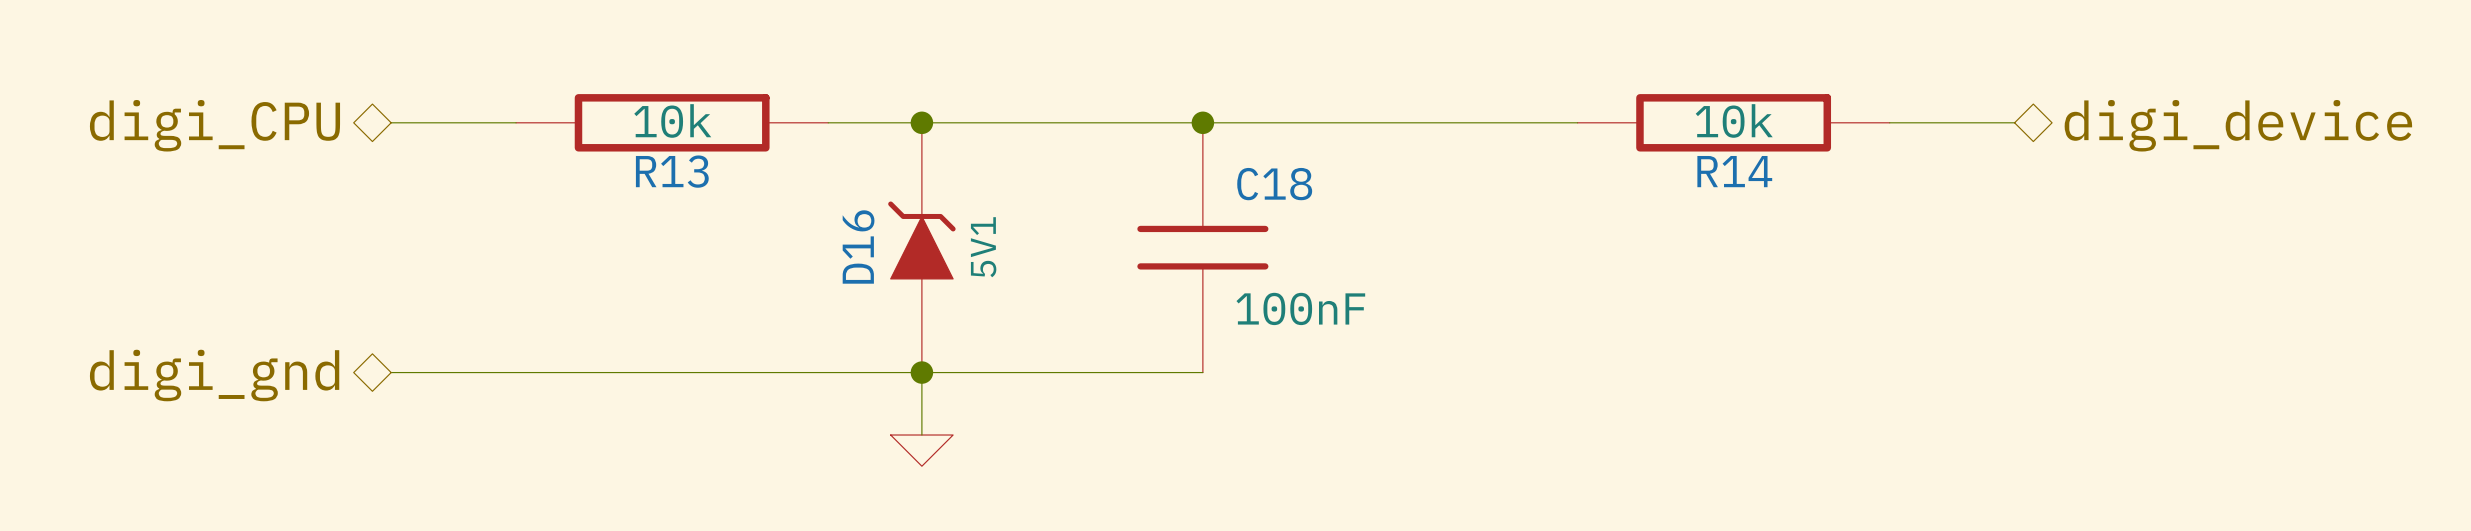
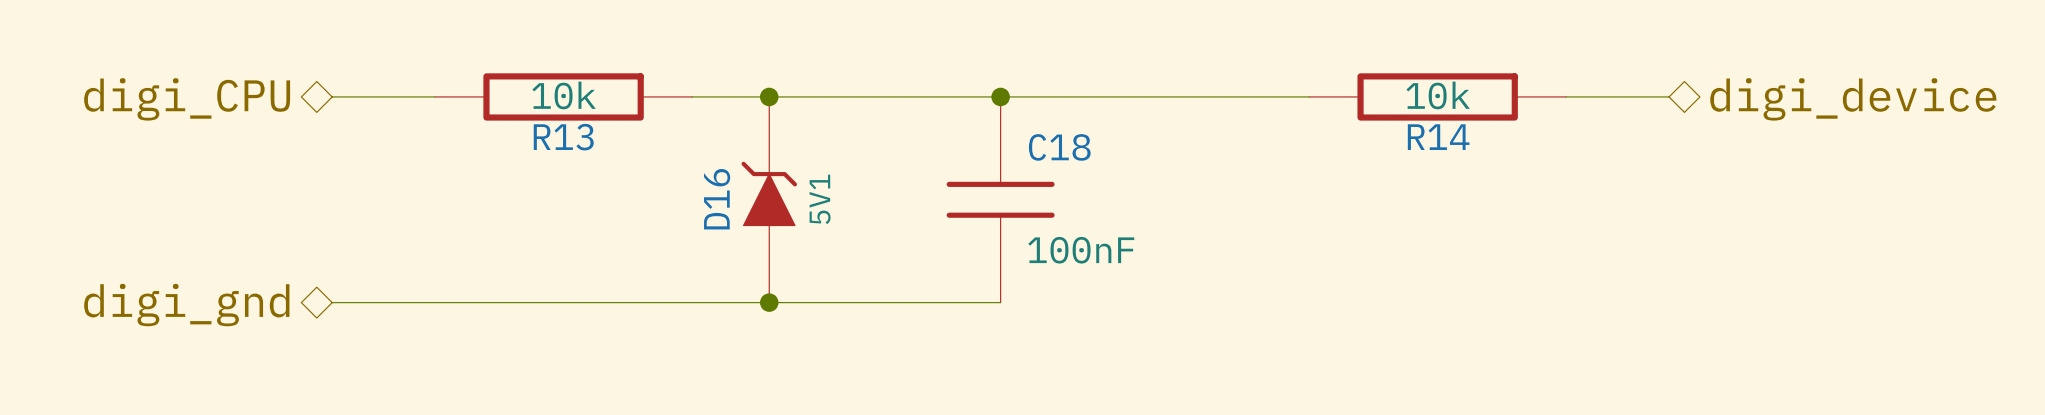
wire: (921, 372) (921, 435) -> none
power symbol: (921, 450) -> none

